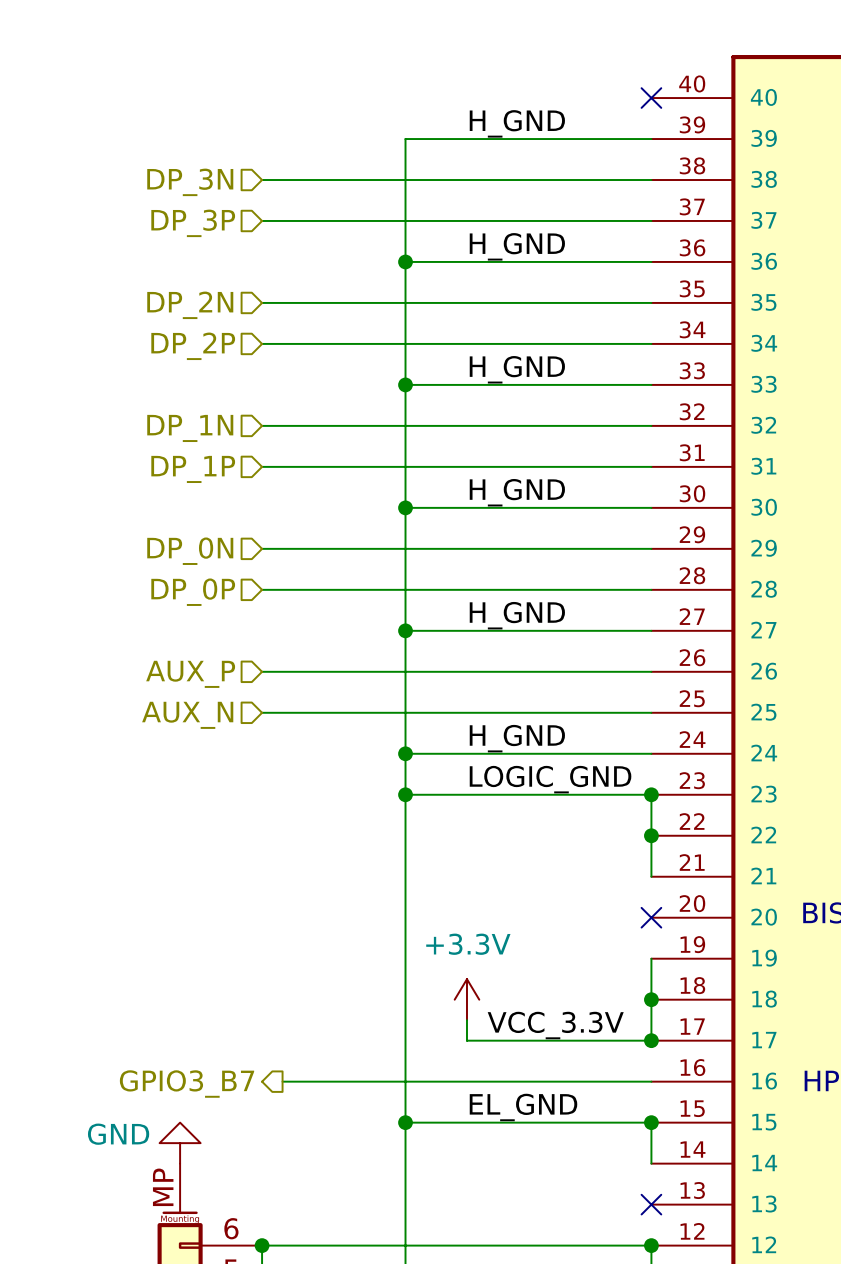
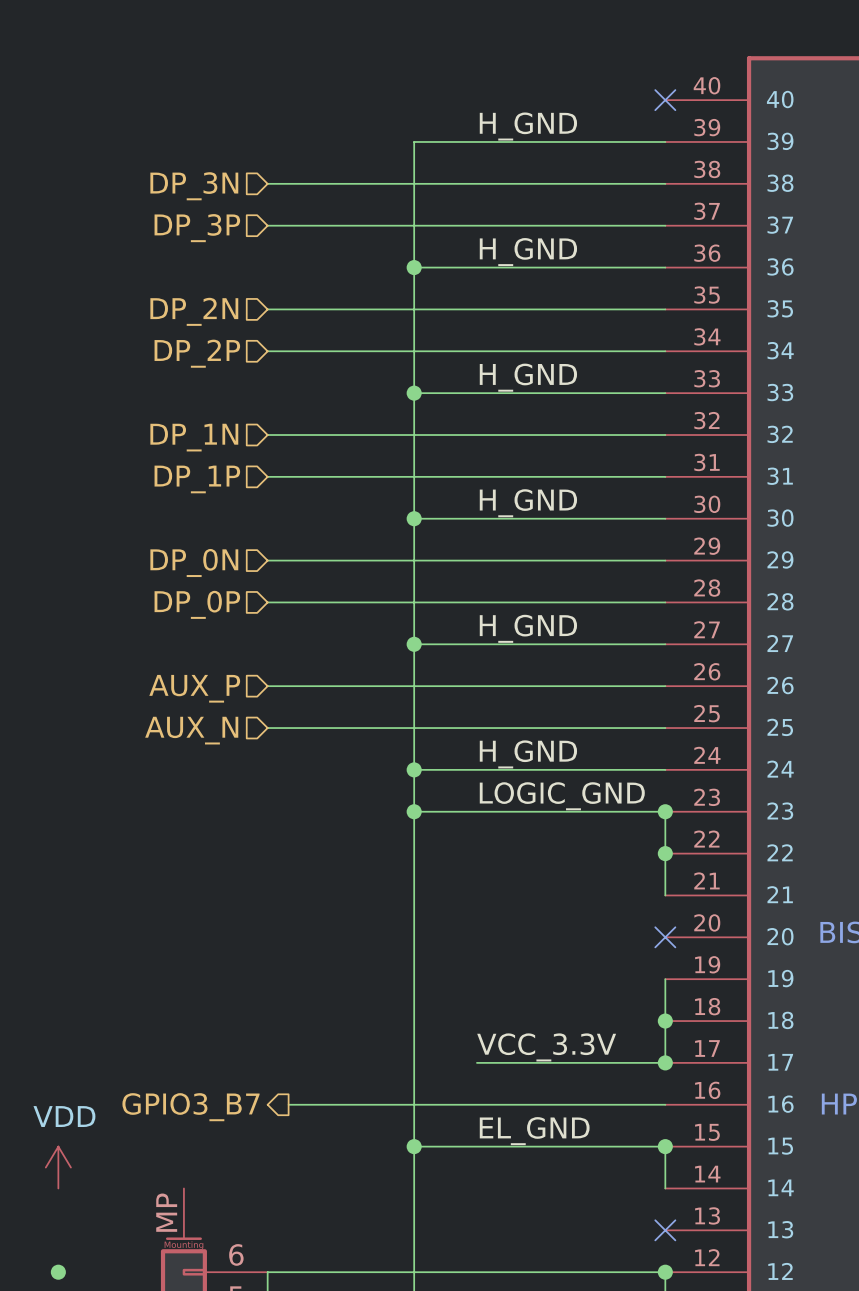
power symbol: +3.3V (466, 999) -> none
wire: (466, 1020) (466, 1040) -> none
label position: VCC_3.3V (555, 1025) -> VCC_3.3V (546, 1047)
power symbol: none -> VDD (58, 1167)
power symbol: GND (180, 1143) -> none
junction: none -> (58, 1272)
junction: (262, 1245) -> none

